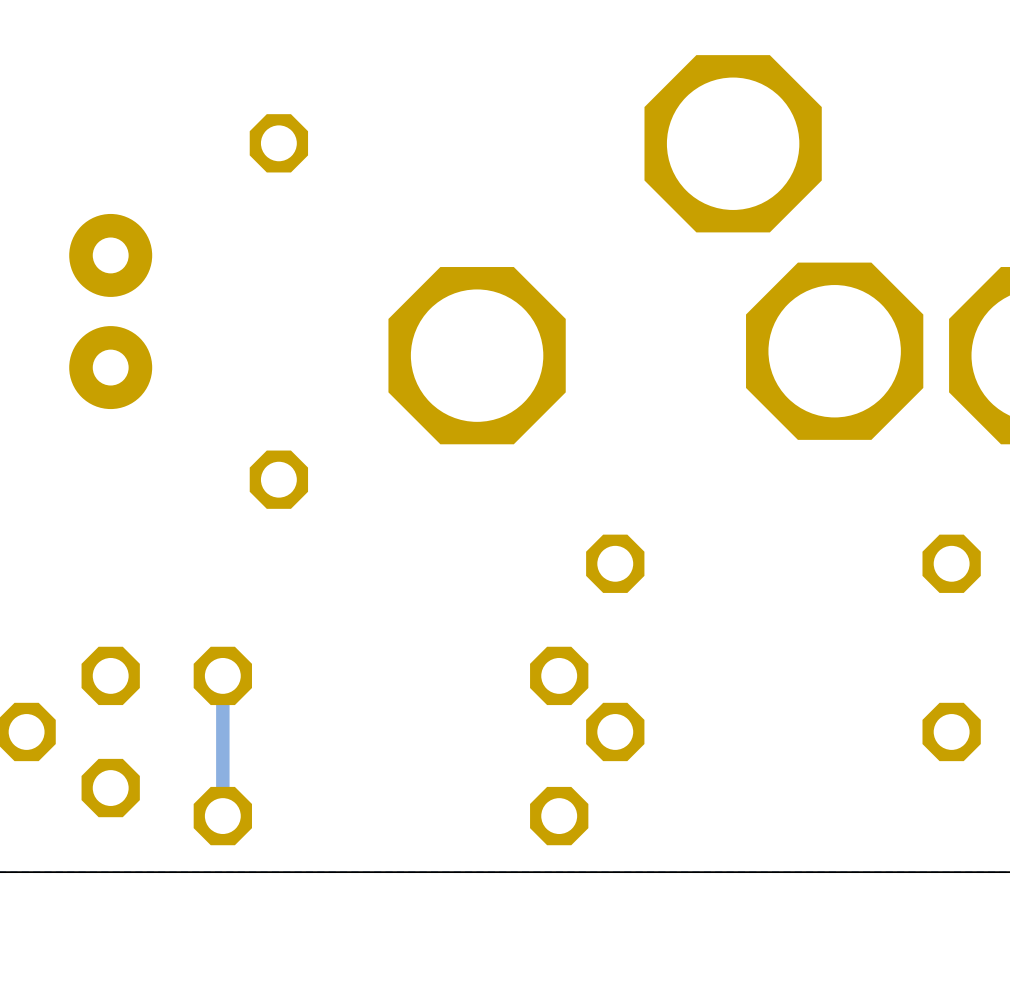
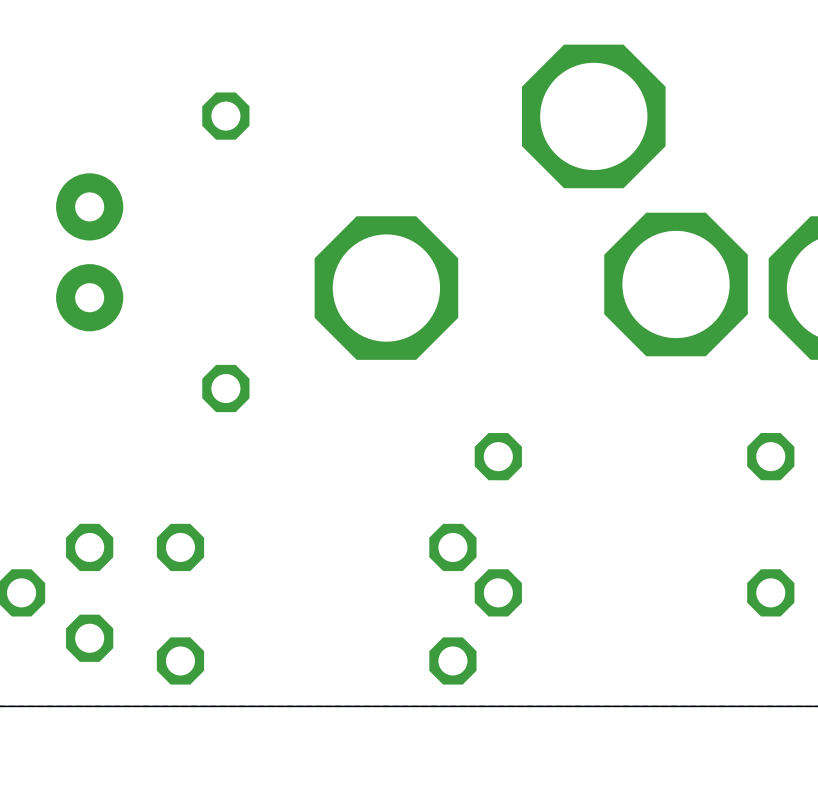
track: (222, 675) (222, 816) -> none

